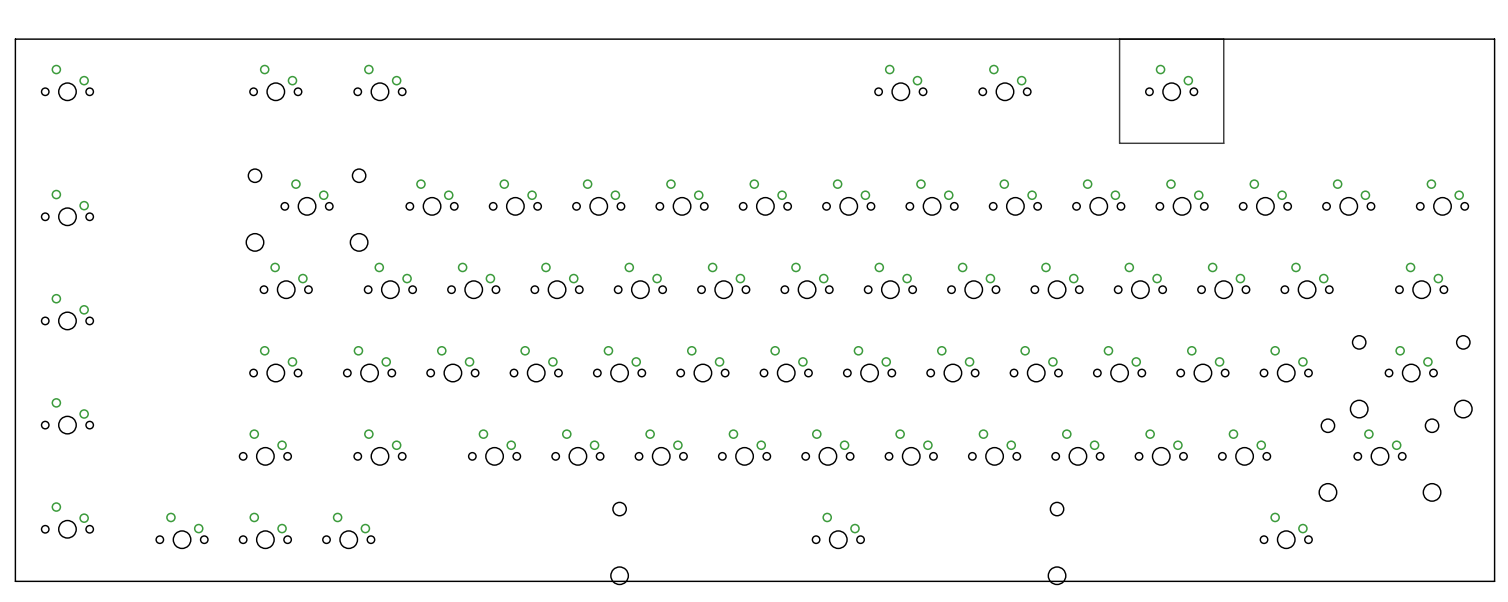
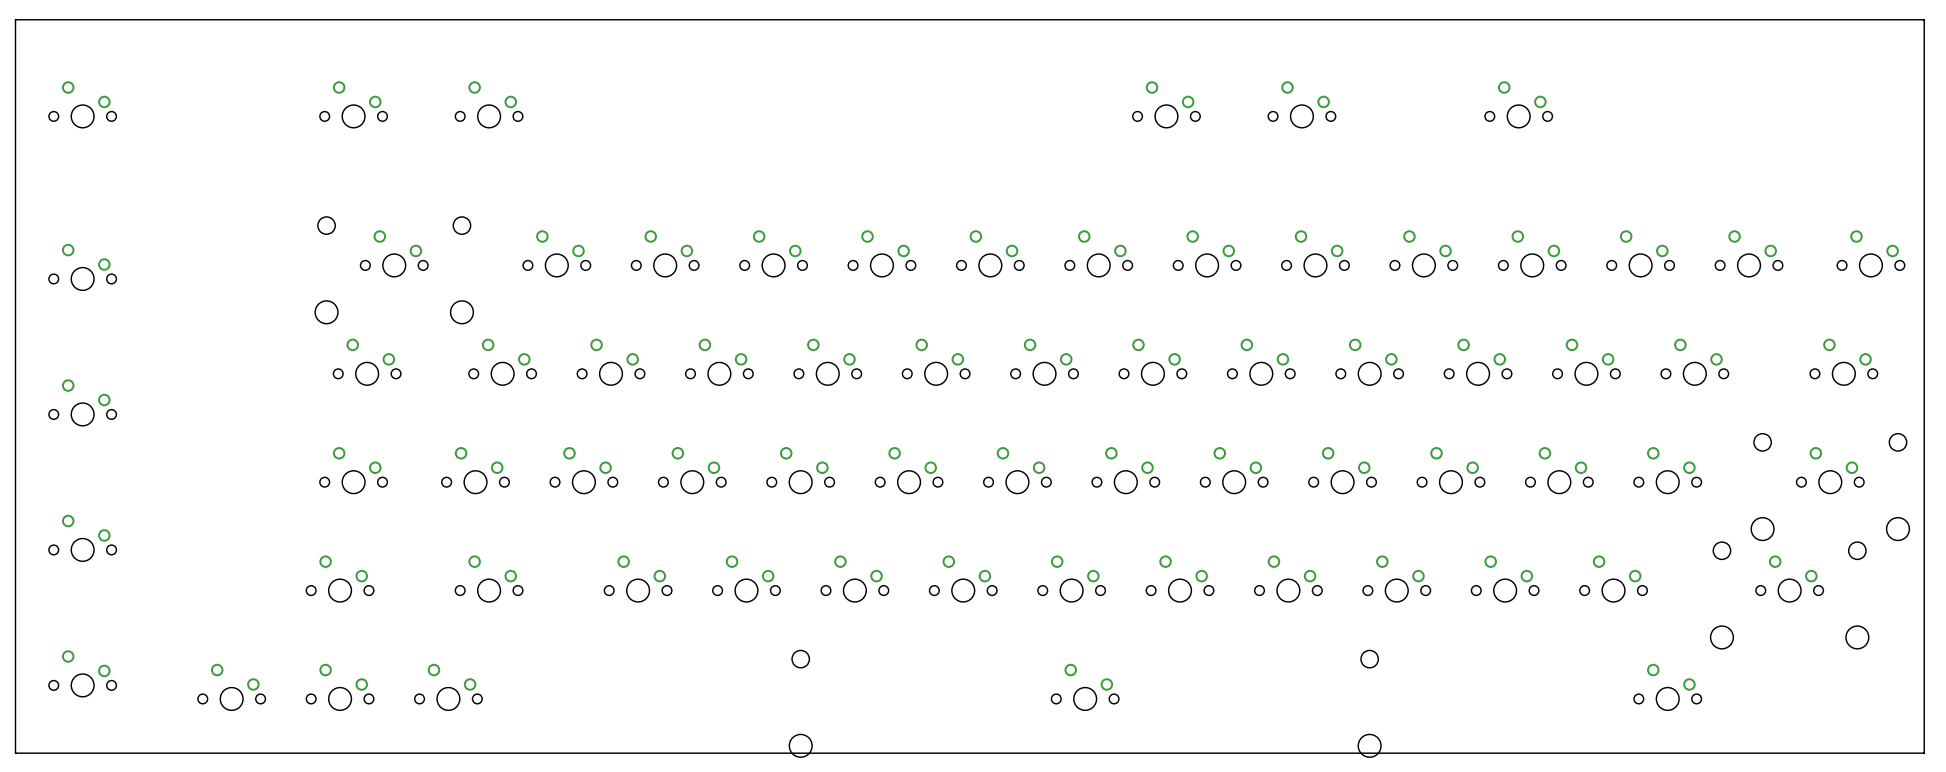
line: (1223, 39) (1119, 39) (1119, 143) (1223, 143) (1223, 39) -> none
board edge: (1494, 39) (15, 39) (15, 581) (1494, 581) (1494, 39) -> (1924, 19) (1924, 753) (15, 753) (15, 19) (1924, 19)

